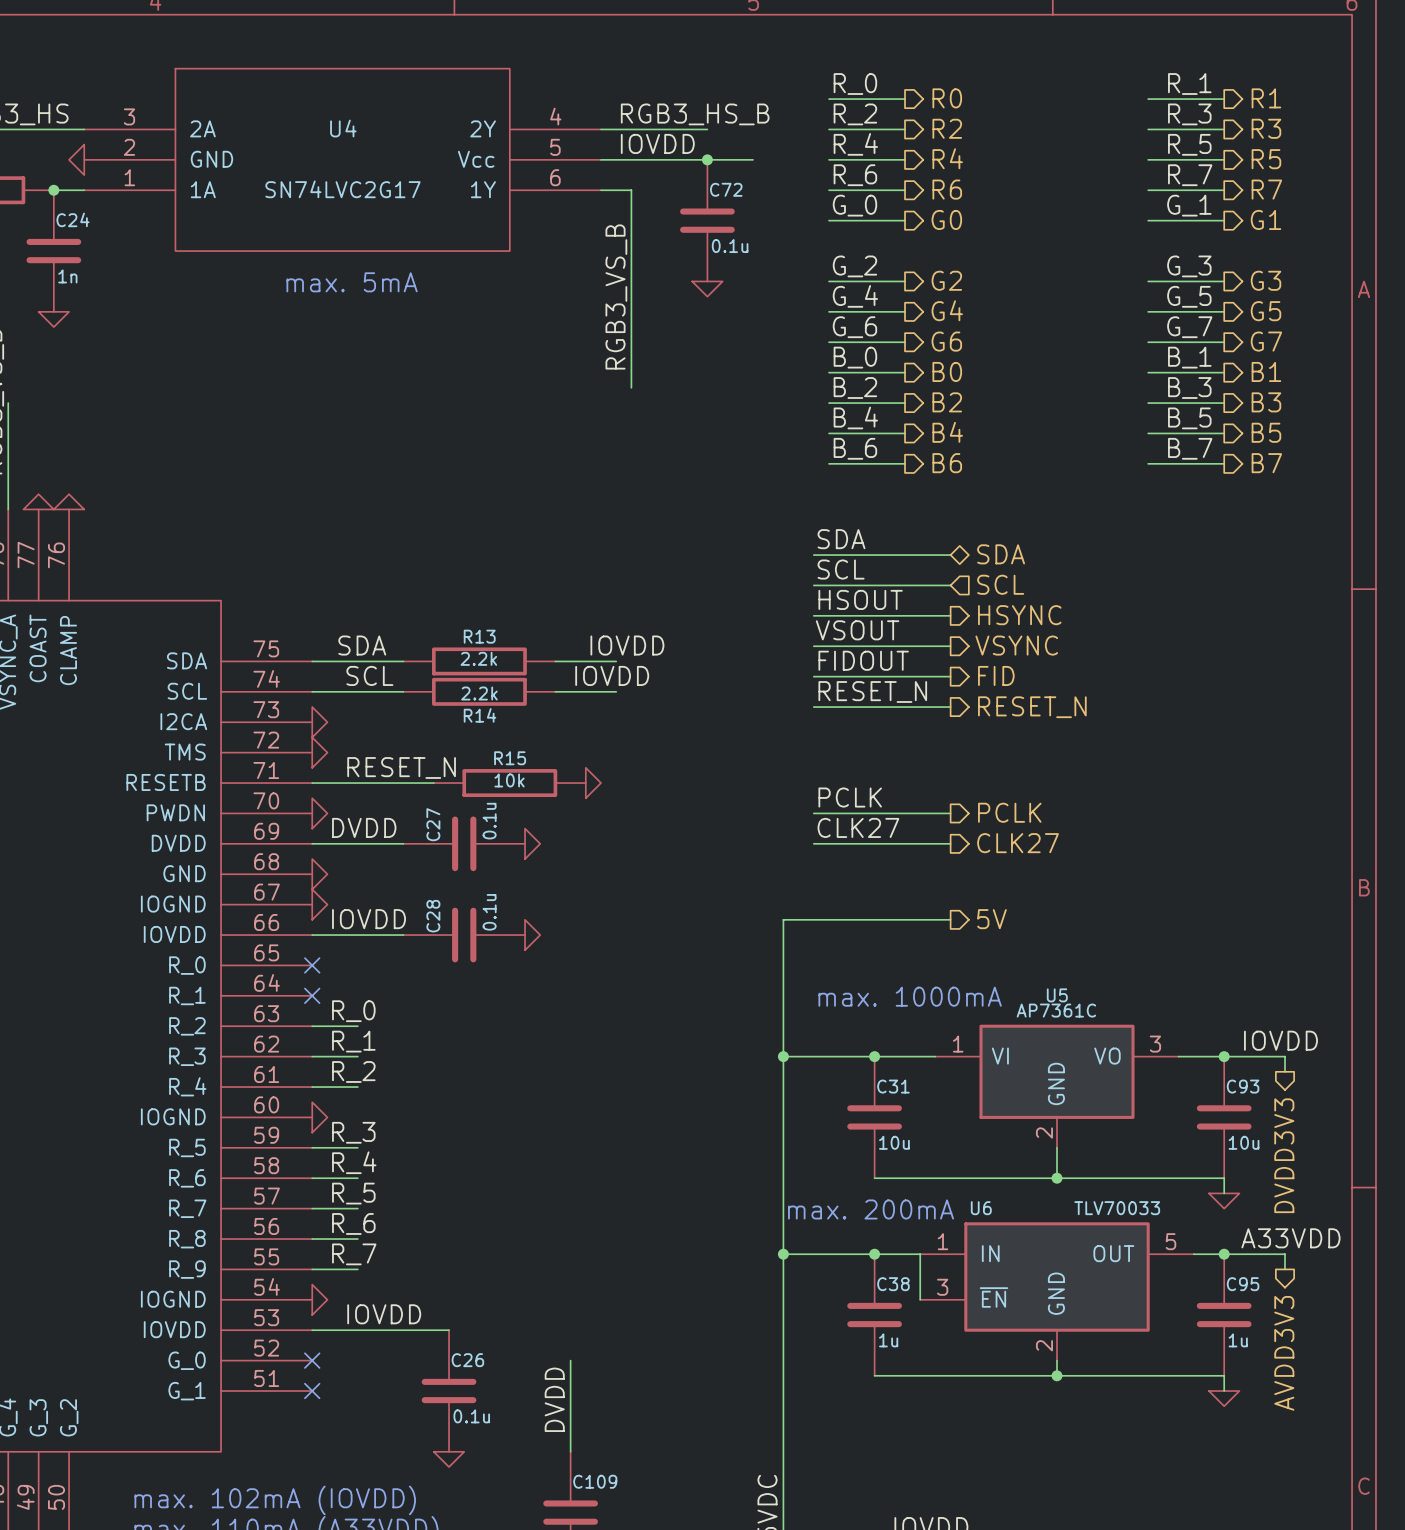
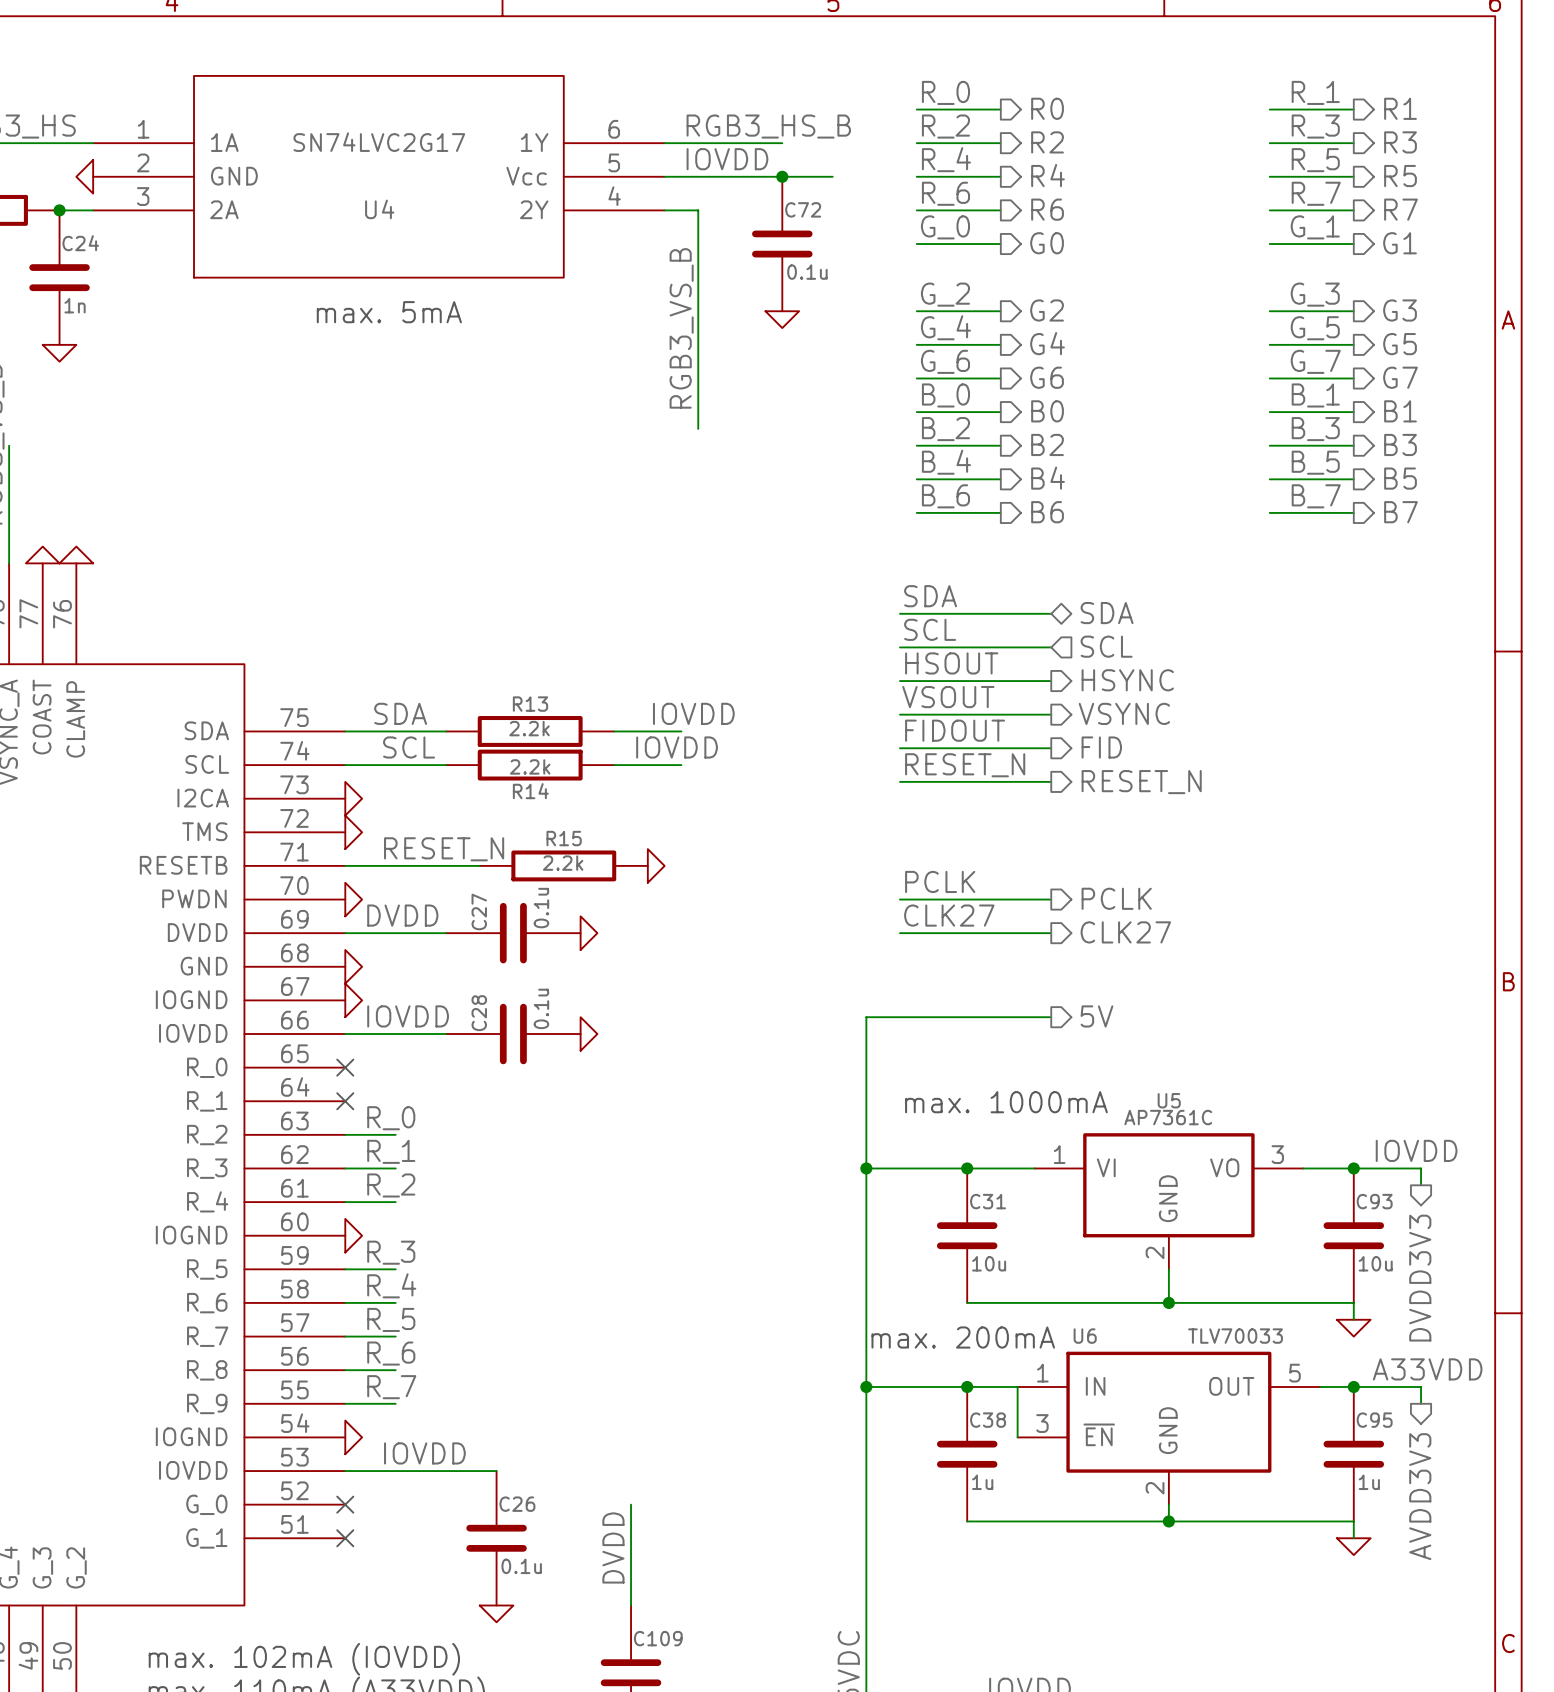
U4 flip: as is (342, 159) -> up-down (378, 176)
R15 value: 10k (509, 780) -> 2.2k (563, 863)

